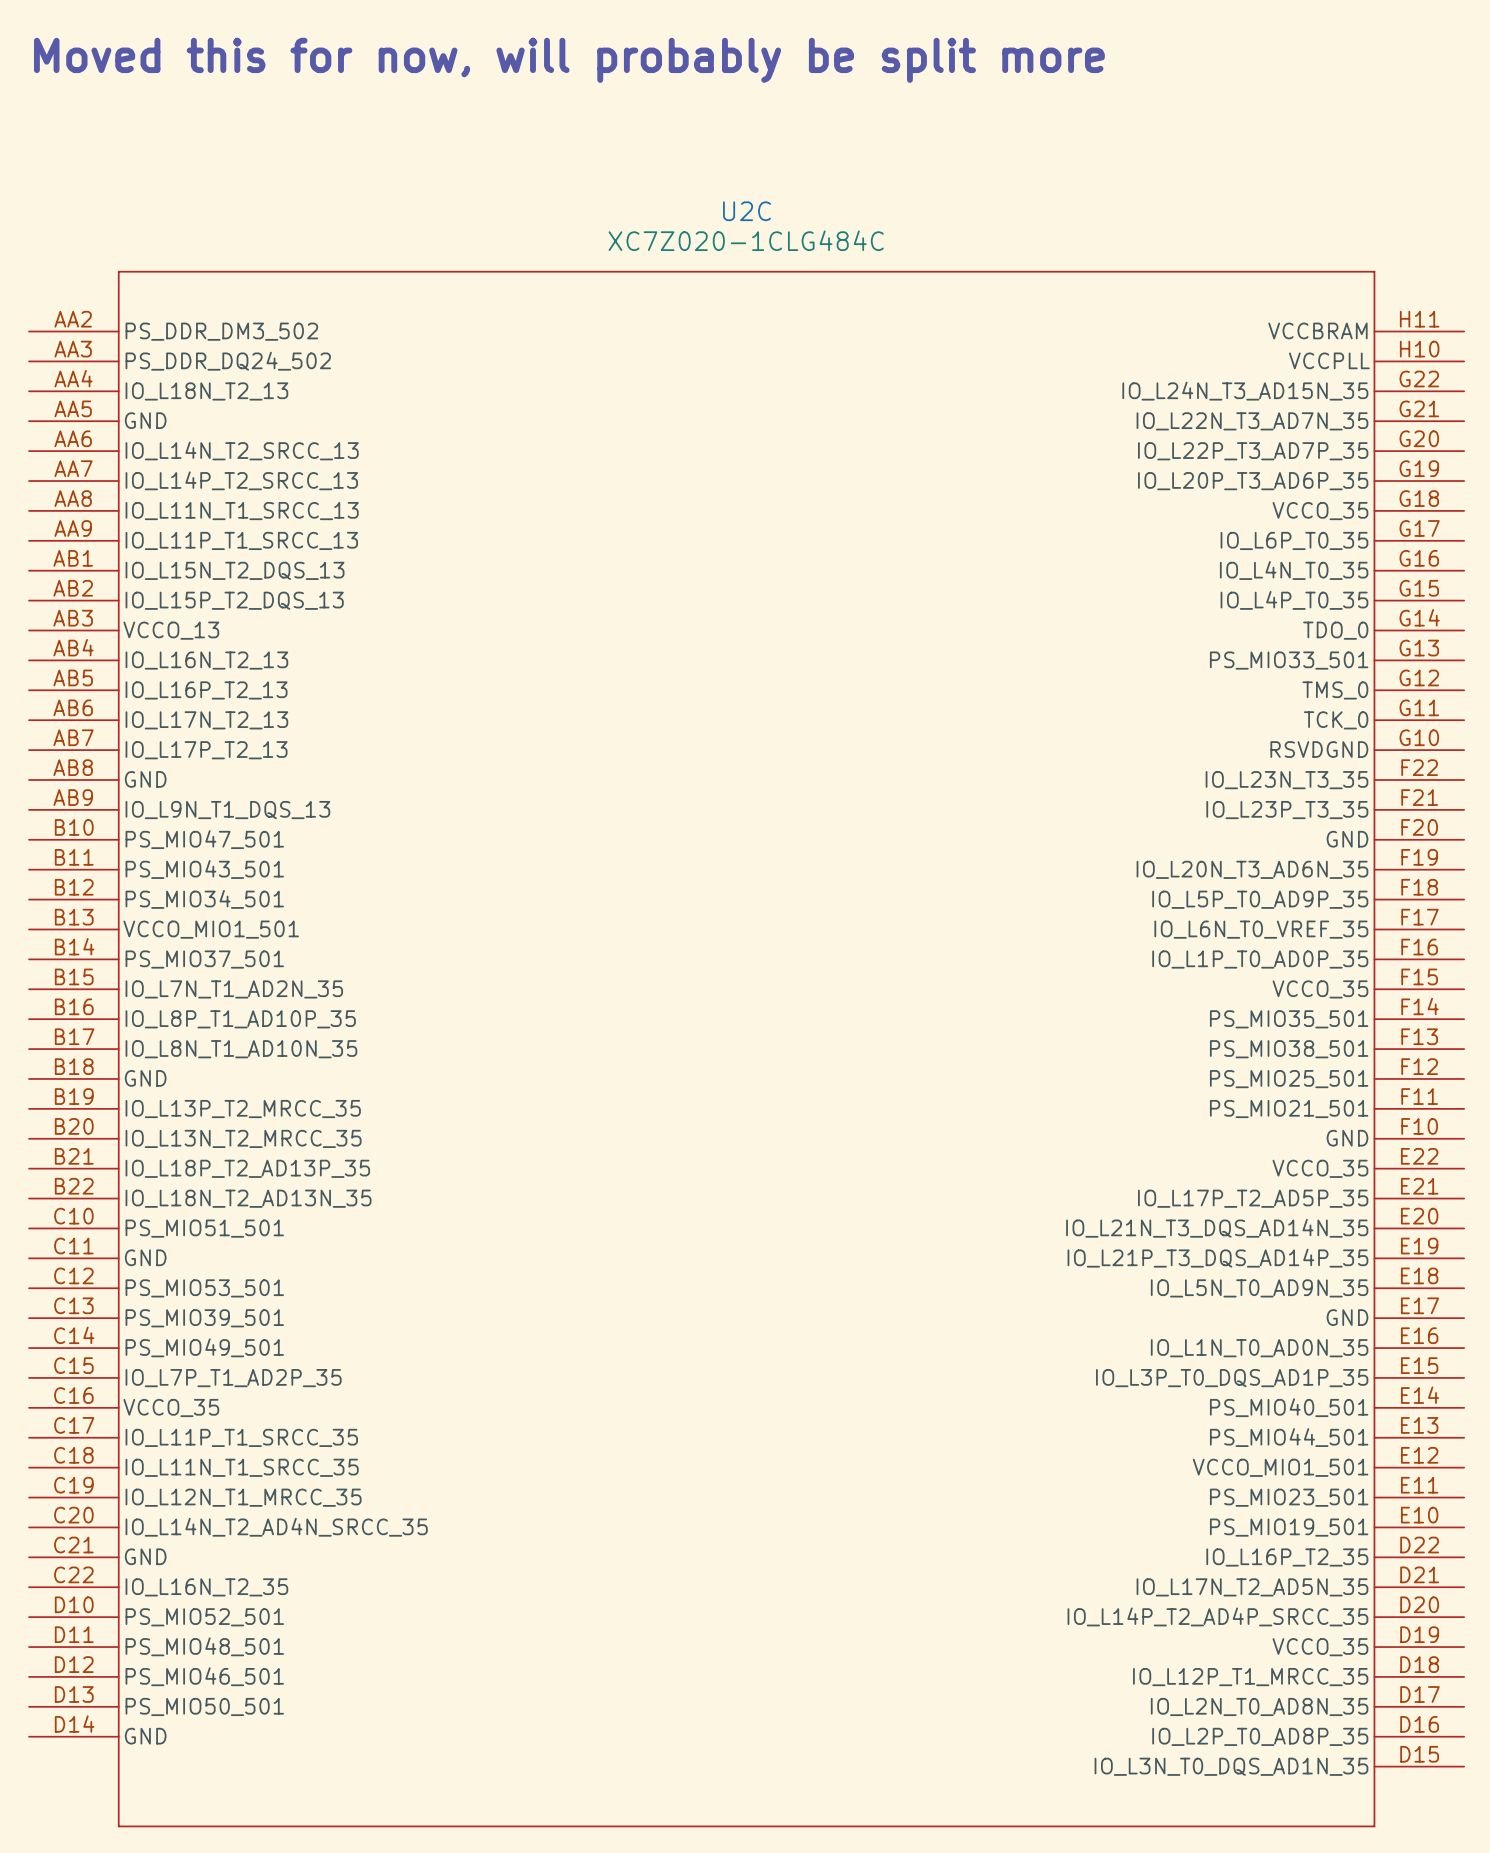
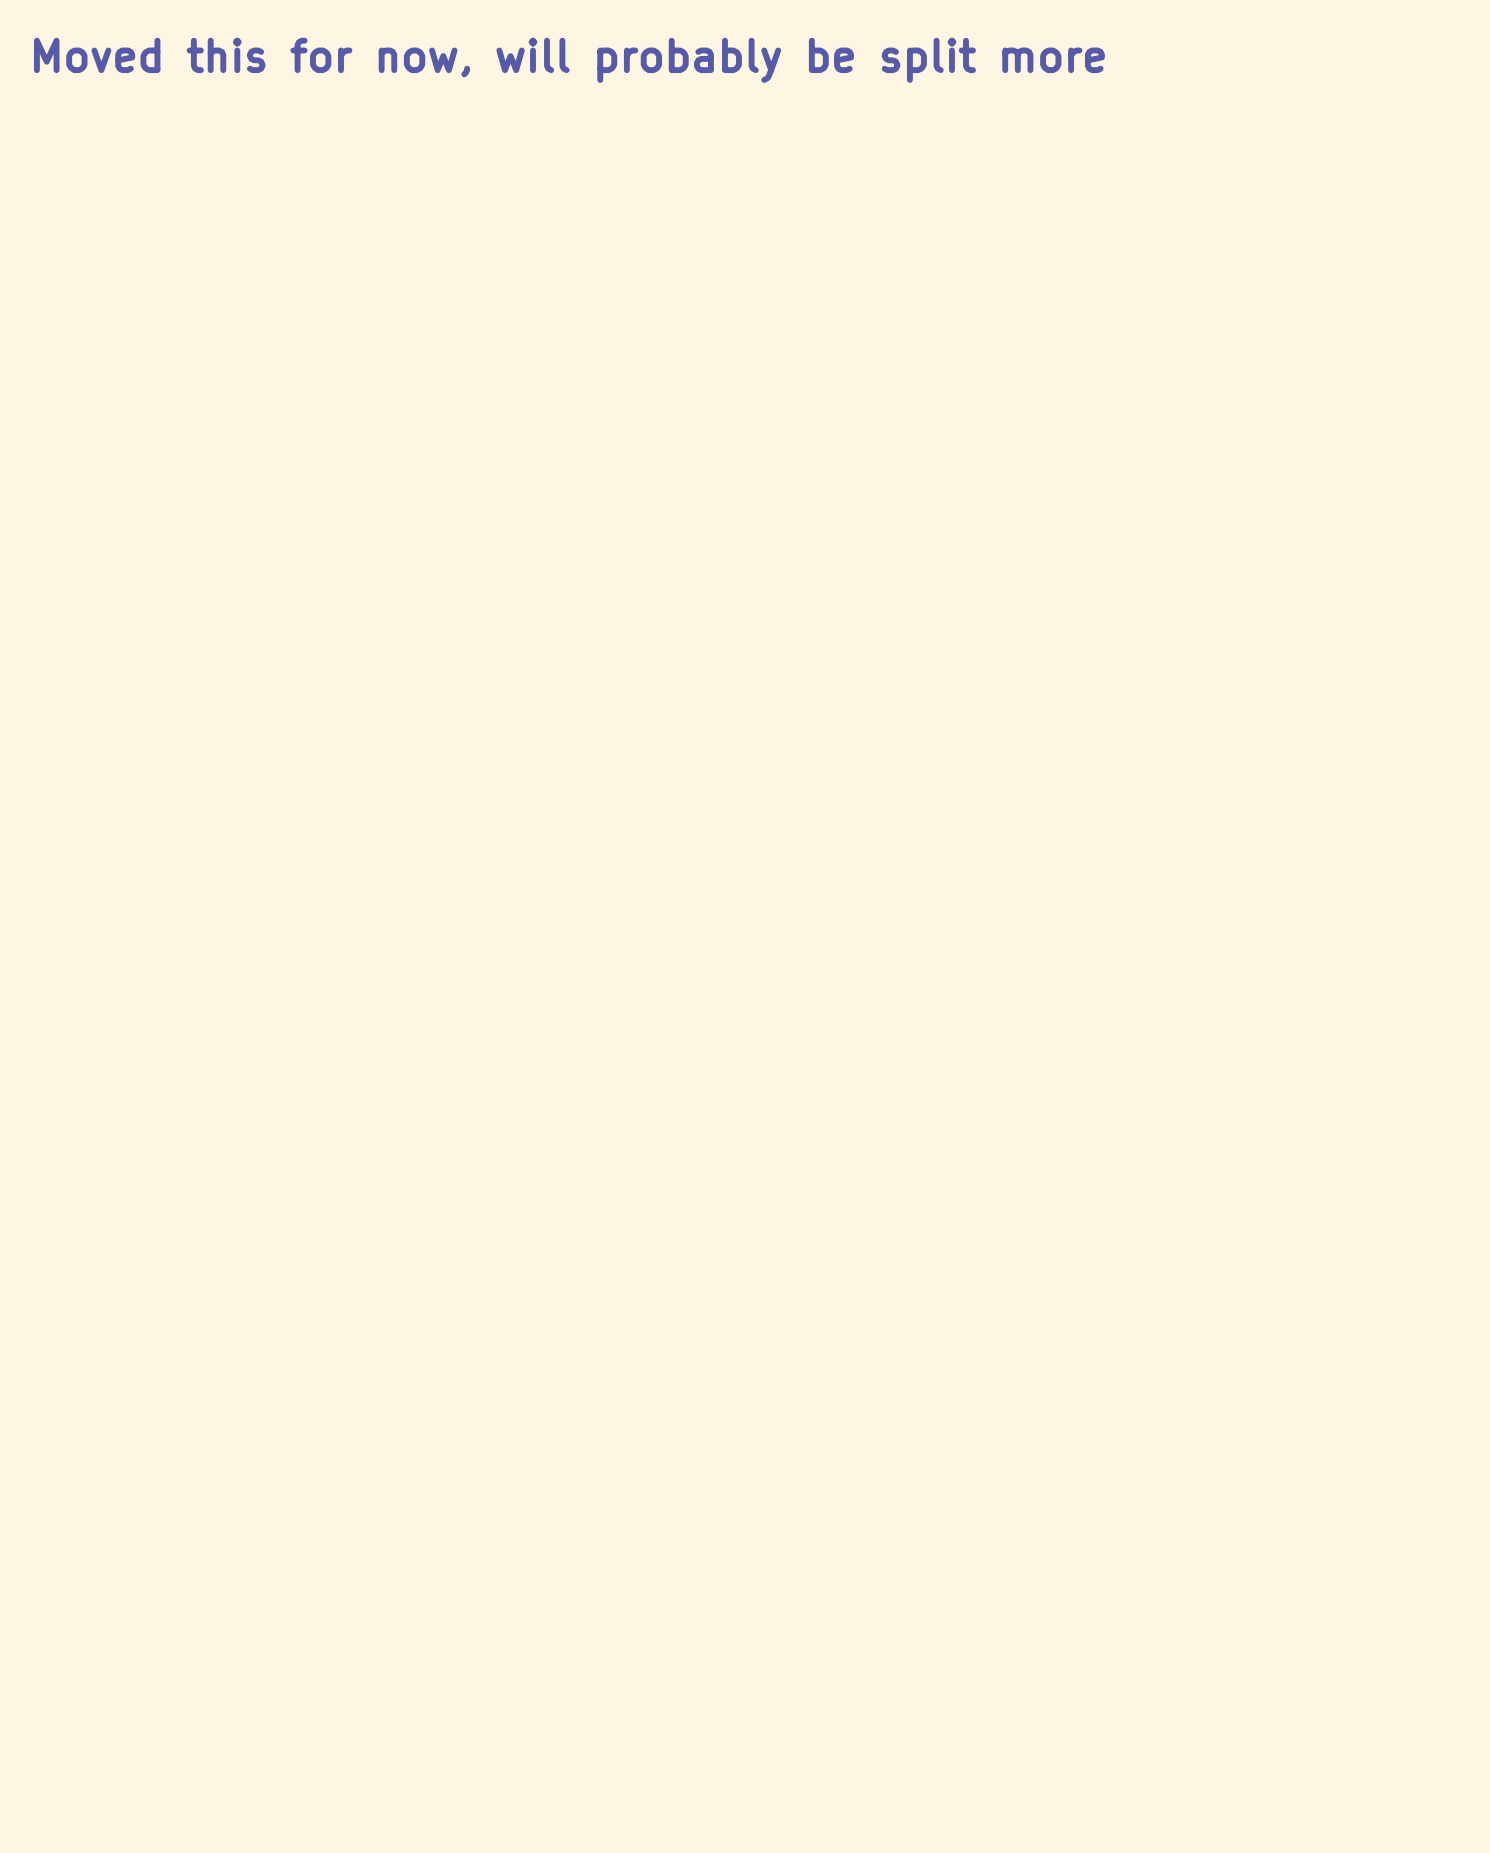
U2C: XC7Z020-1CLG484C (746, 1049) -> none

